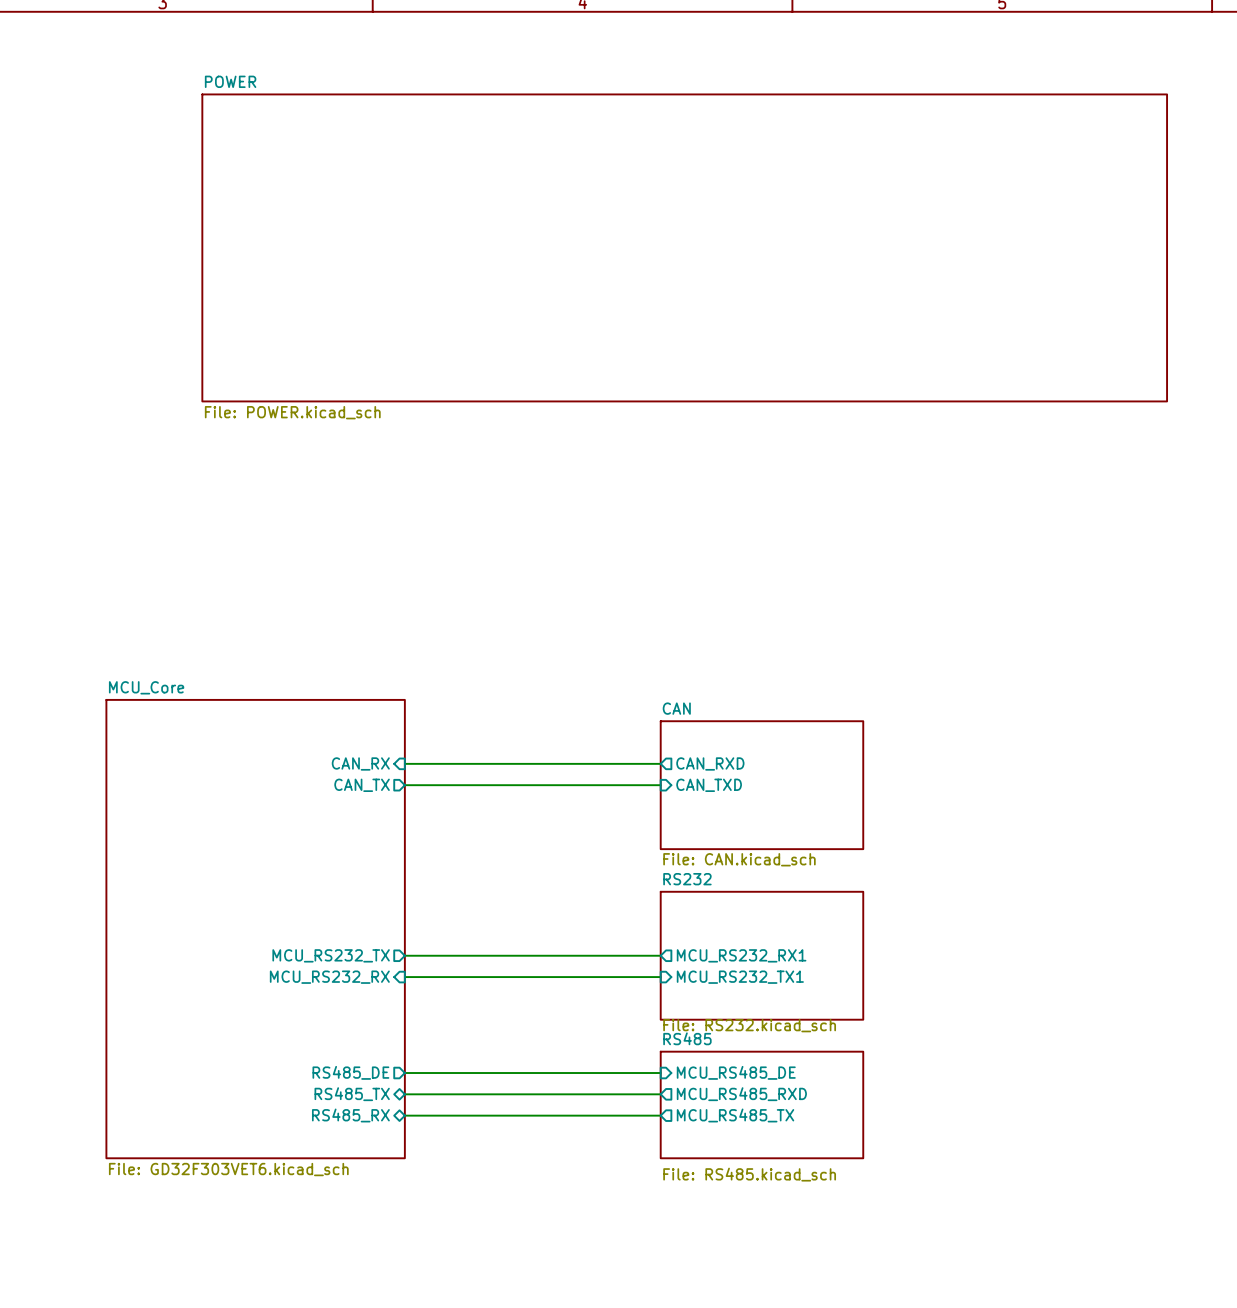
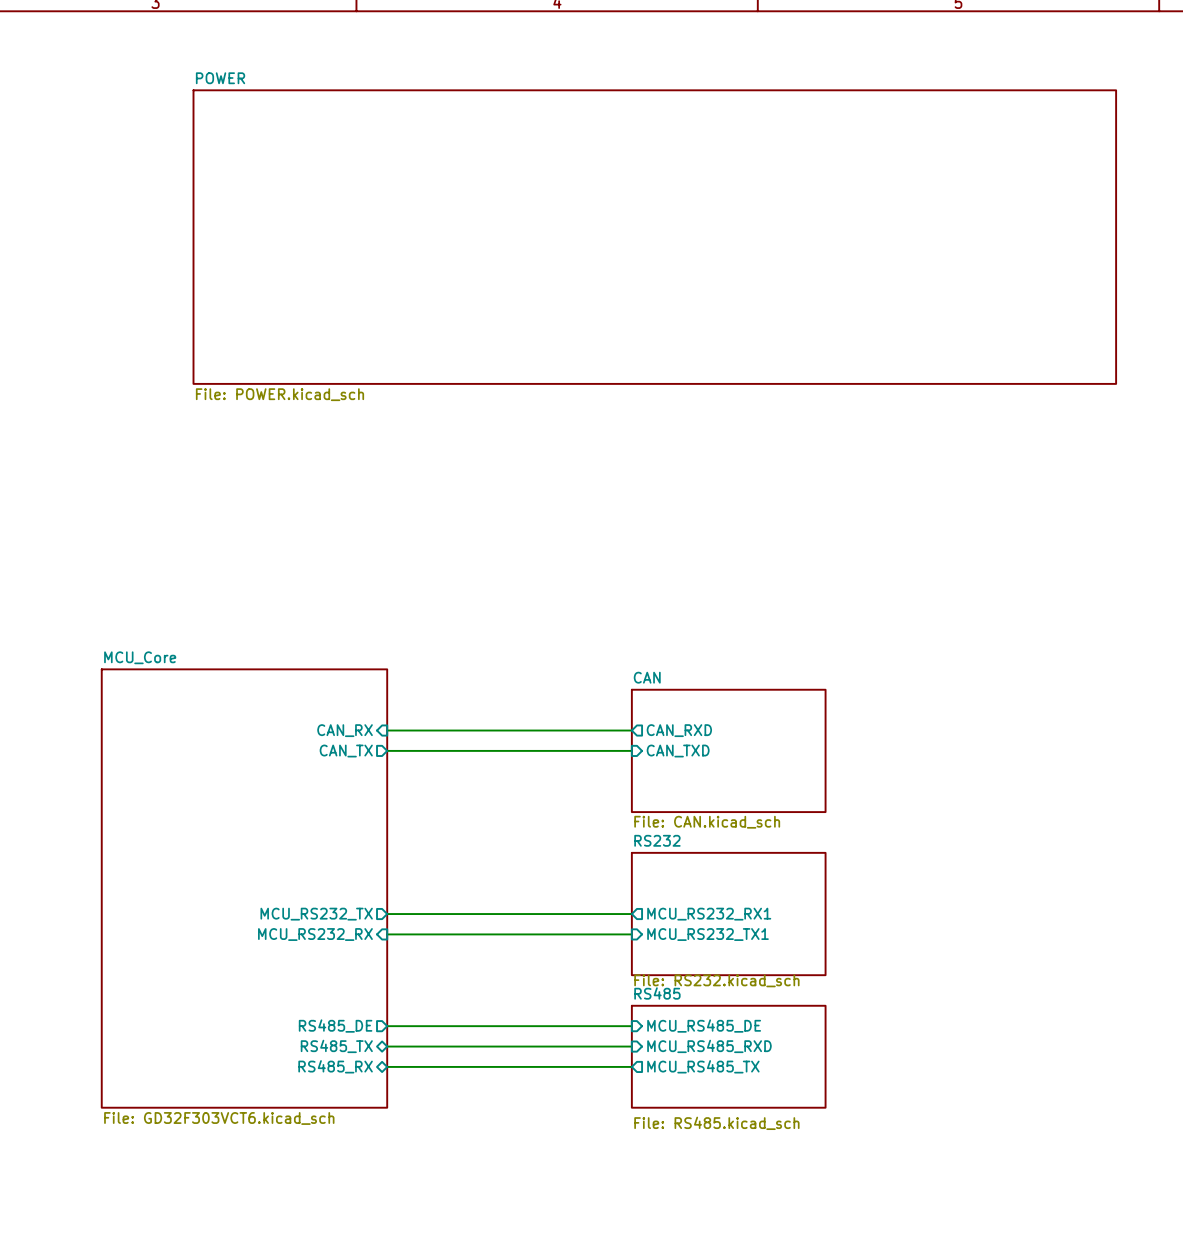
sheet pin shape: output (741, 1094) -> input (709, 1046)
sheet MCU_Core value: File: GD32F303VET6.kicad_sch (228, 1169) -> File: GD32F303VCT6.kicad_sch (219, 1118)

